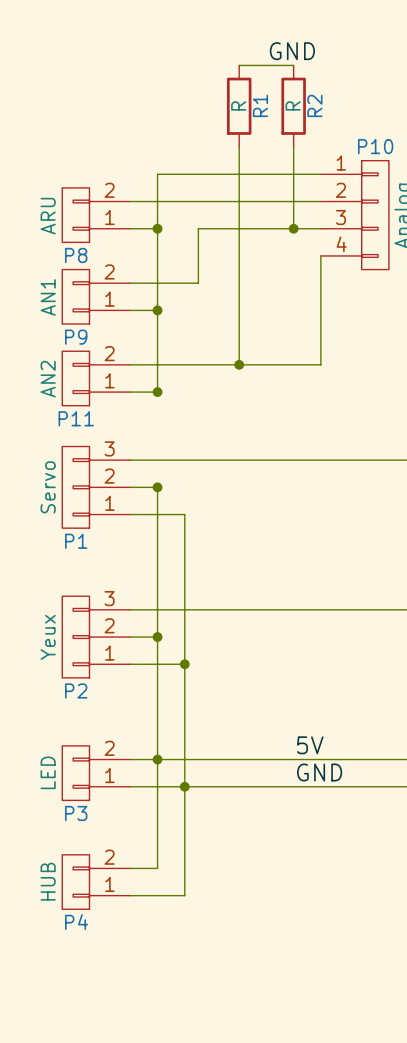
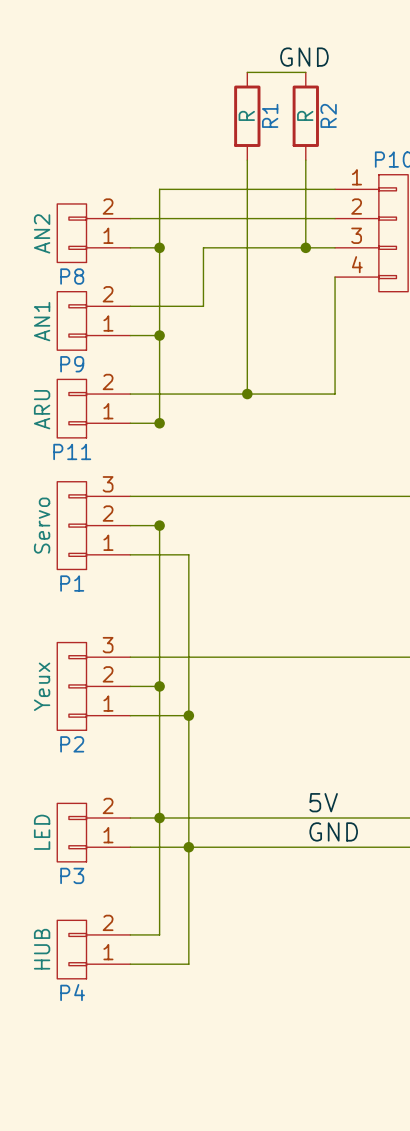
P8 value: ARU (48, 216) -> AN2 (42, 233)
P11 value: AN2 (48, 379) -> ARU (42, 409)

